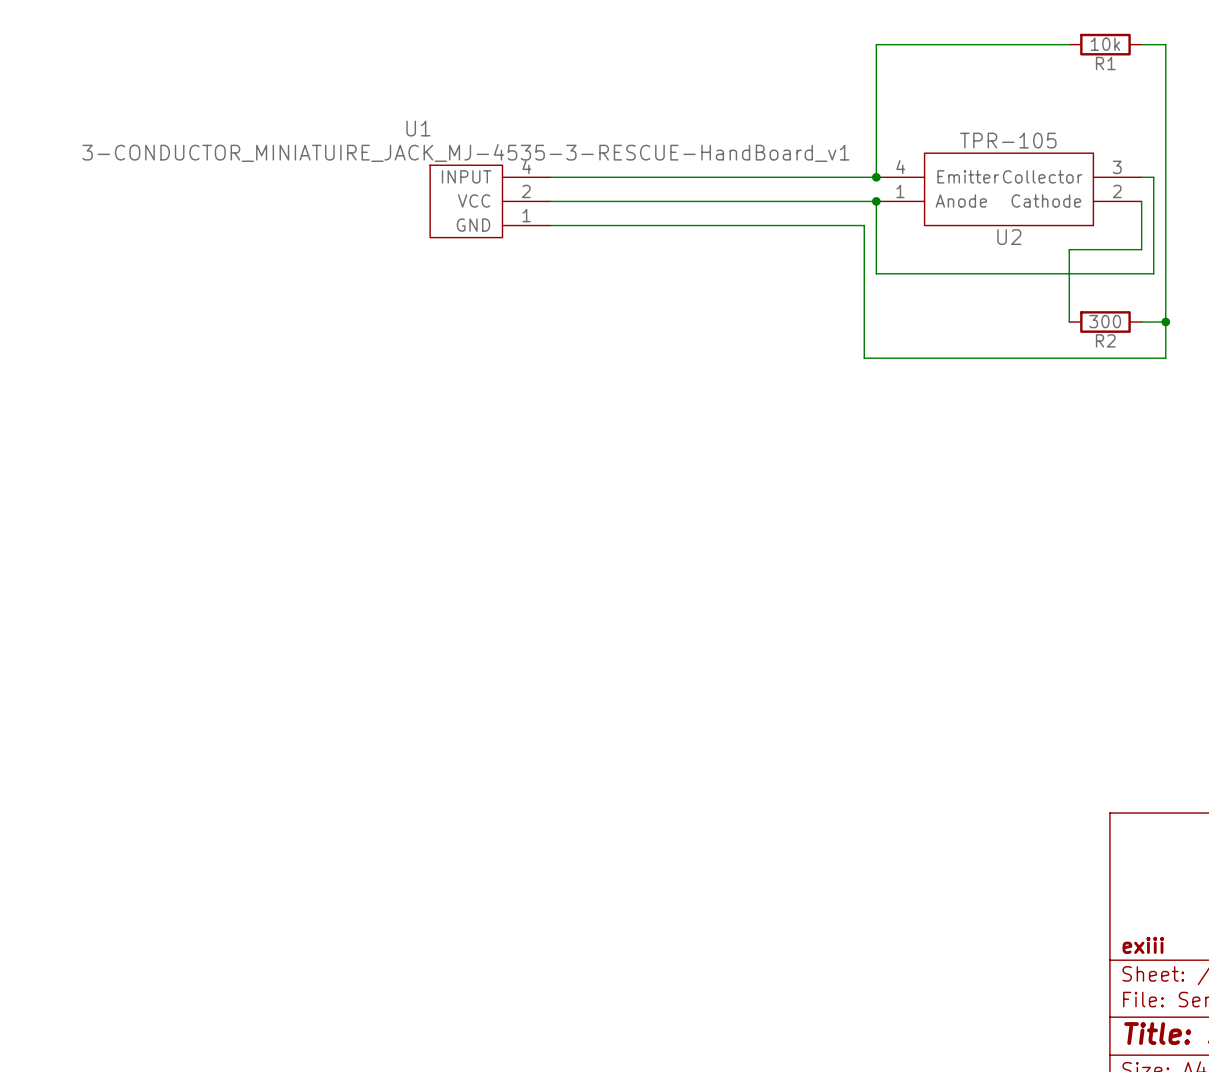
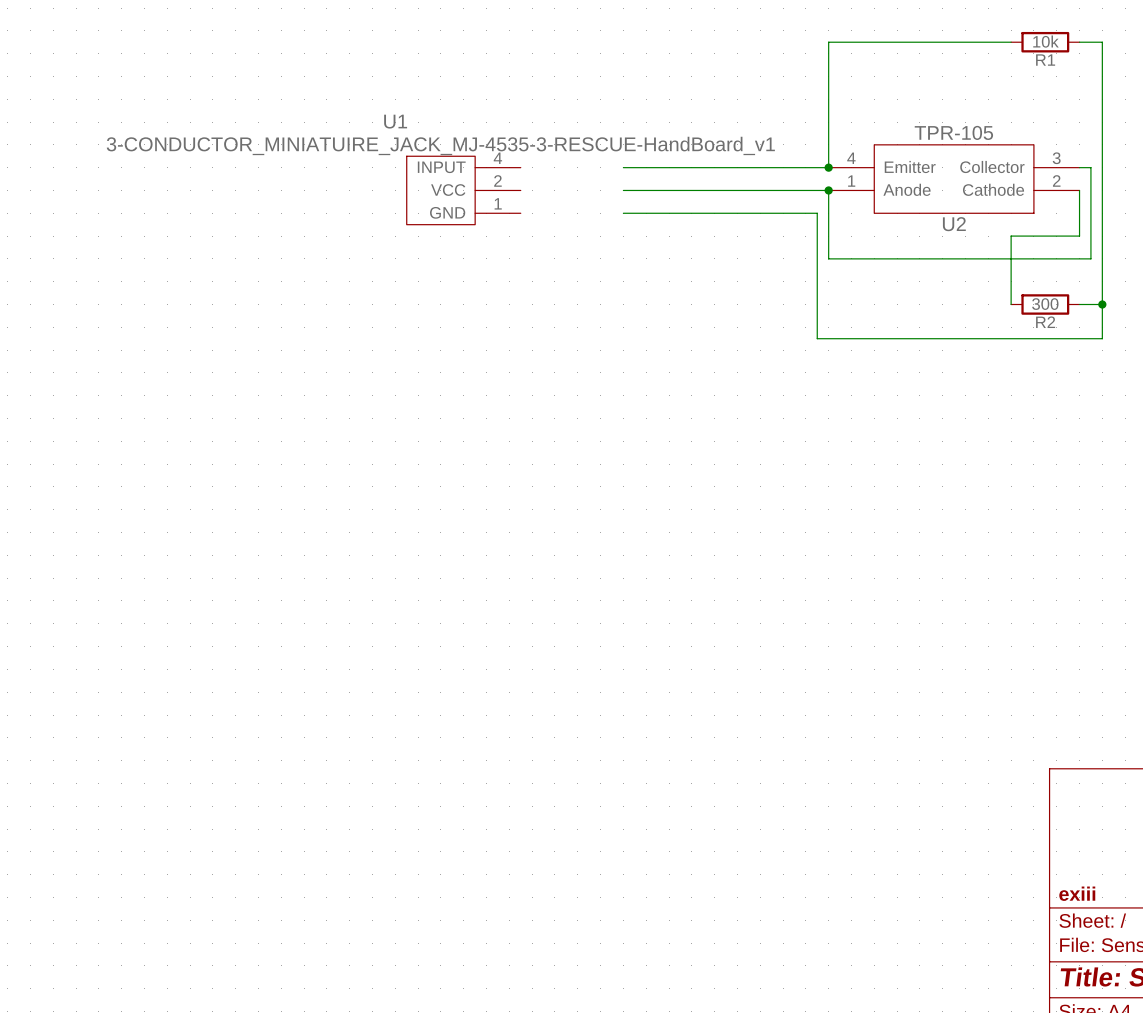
wire: (550, 177) (659, 177) -> none
wire: (550, 201) (659, 201) -> none
wire: (550, 225) (659, 225) -> none

